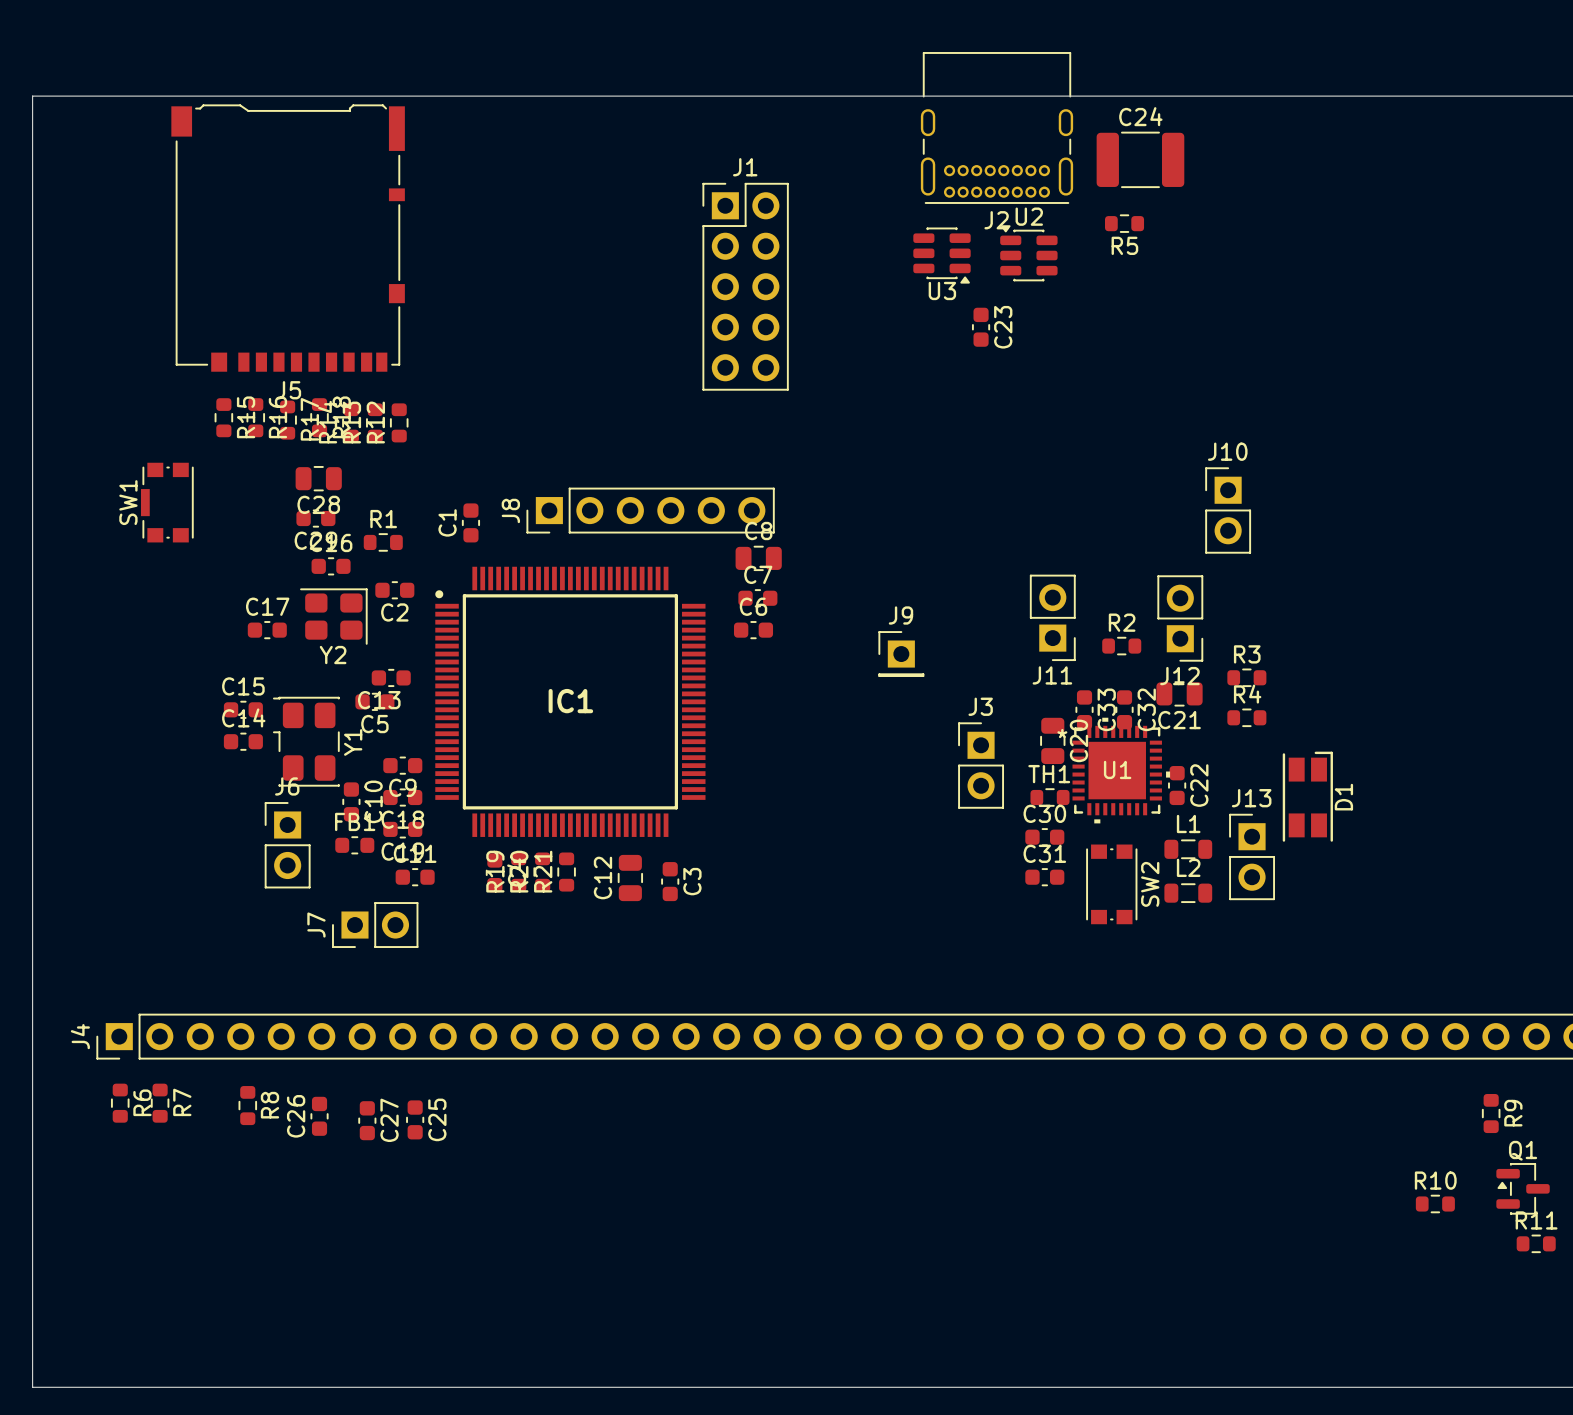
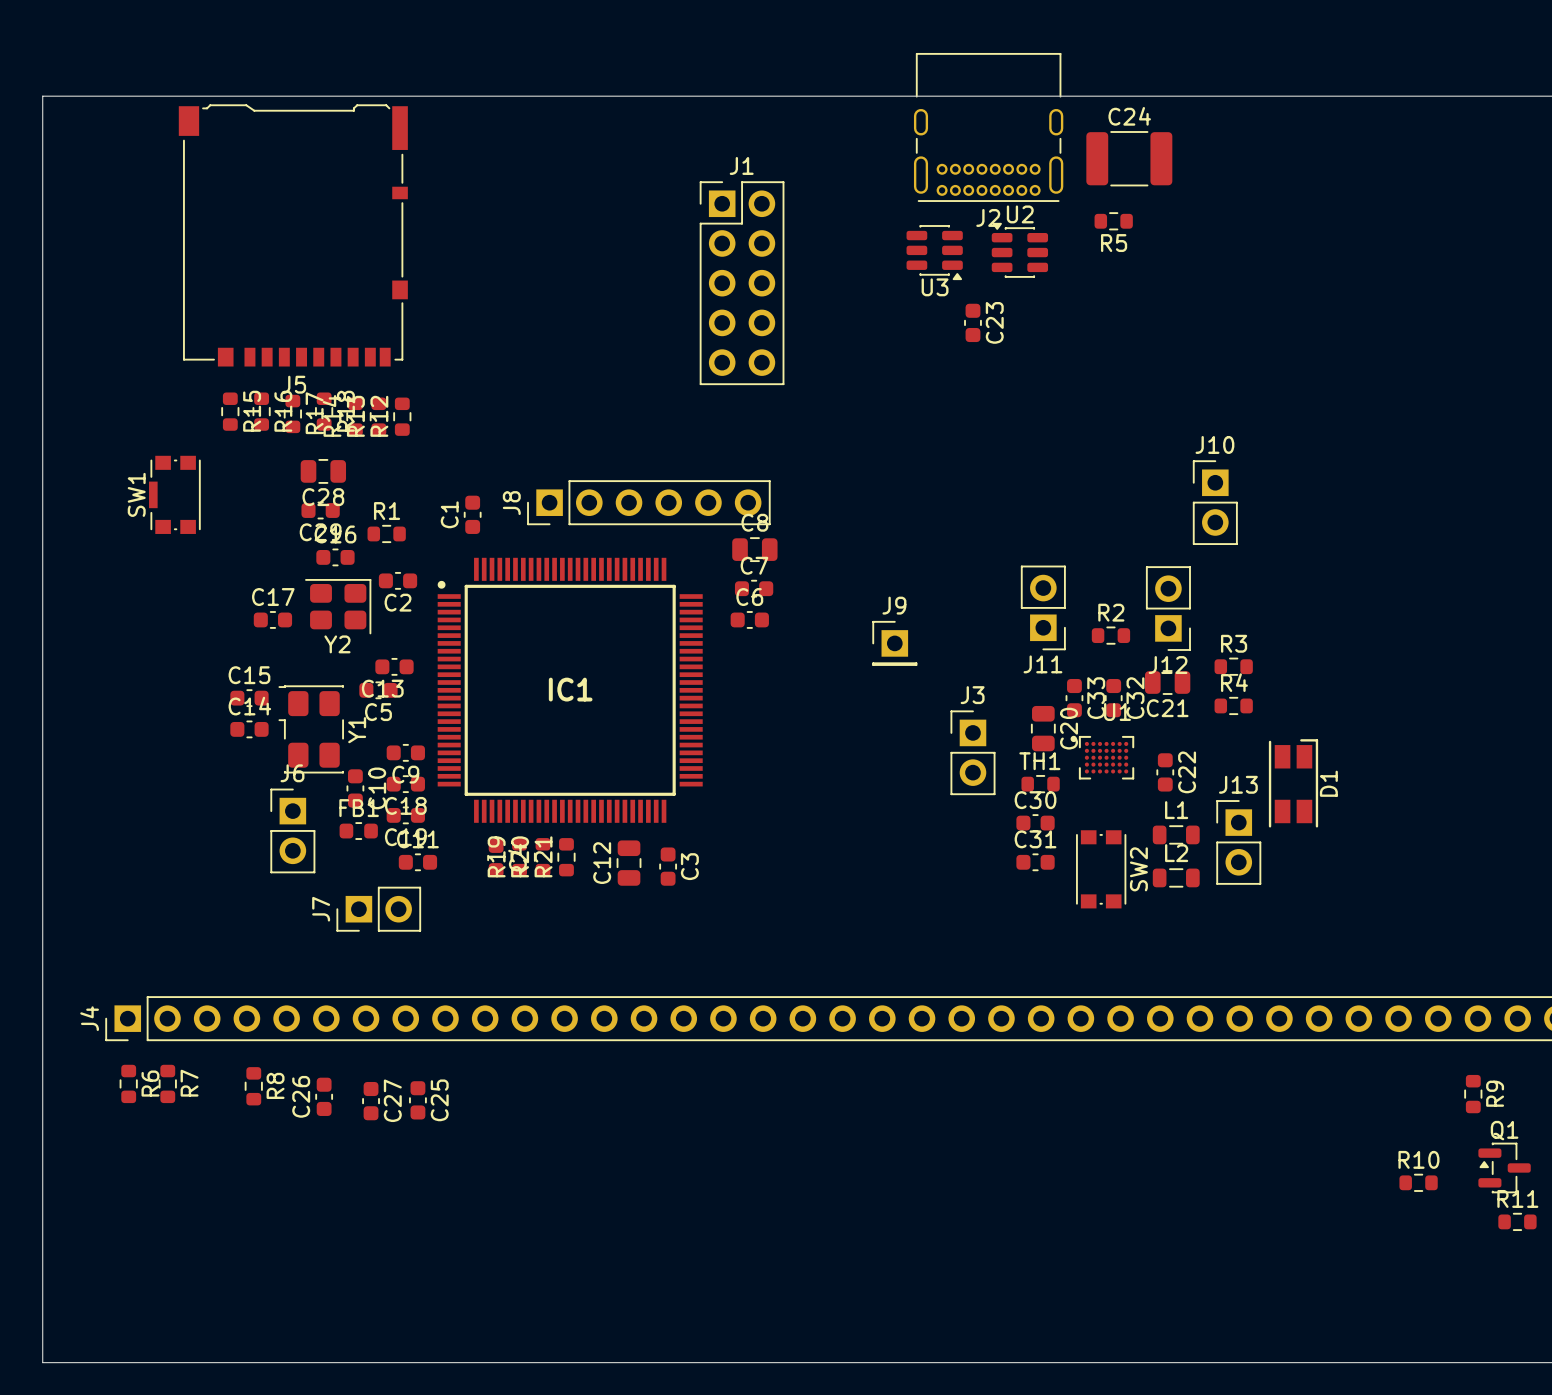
U1 footprint: [1072, 717, 1171, 824] -> [1070, 735, 1135, 780]
U1 name position: U1 (1117, 769) -> U1 (1117, 712)

